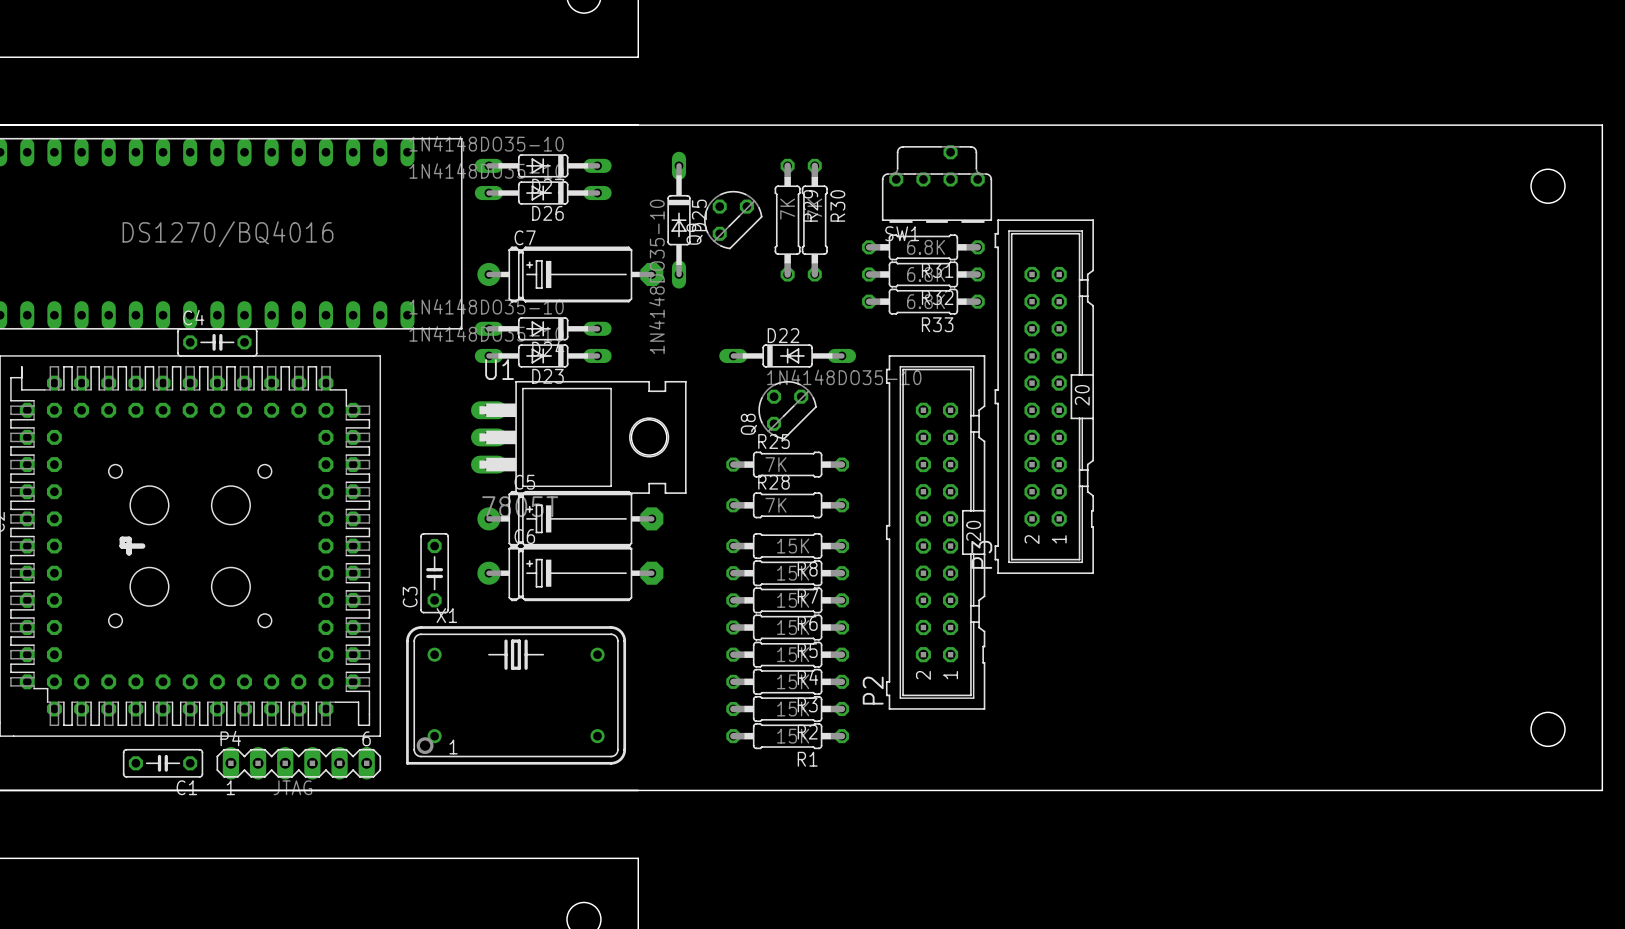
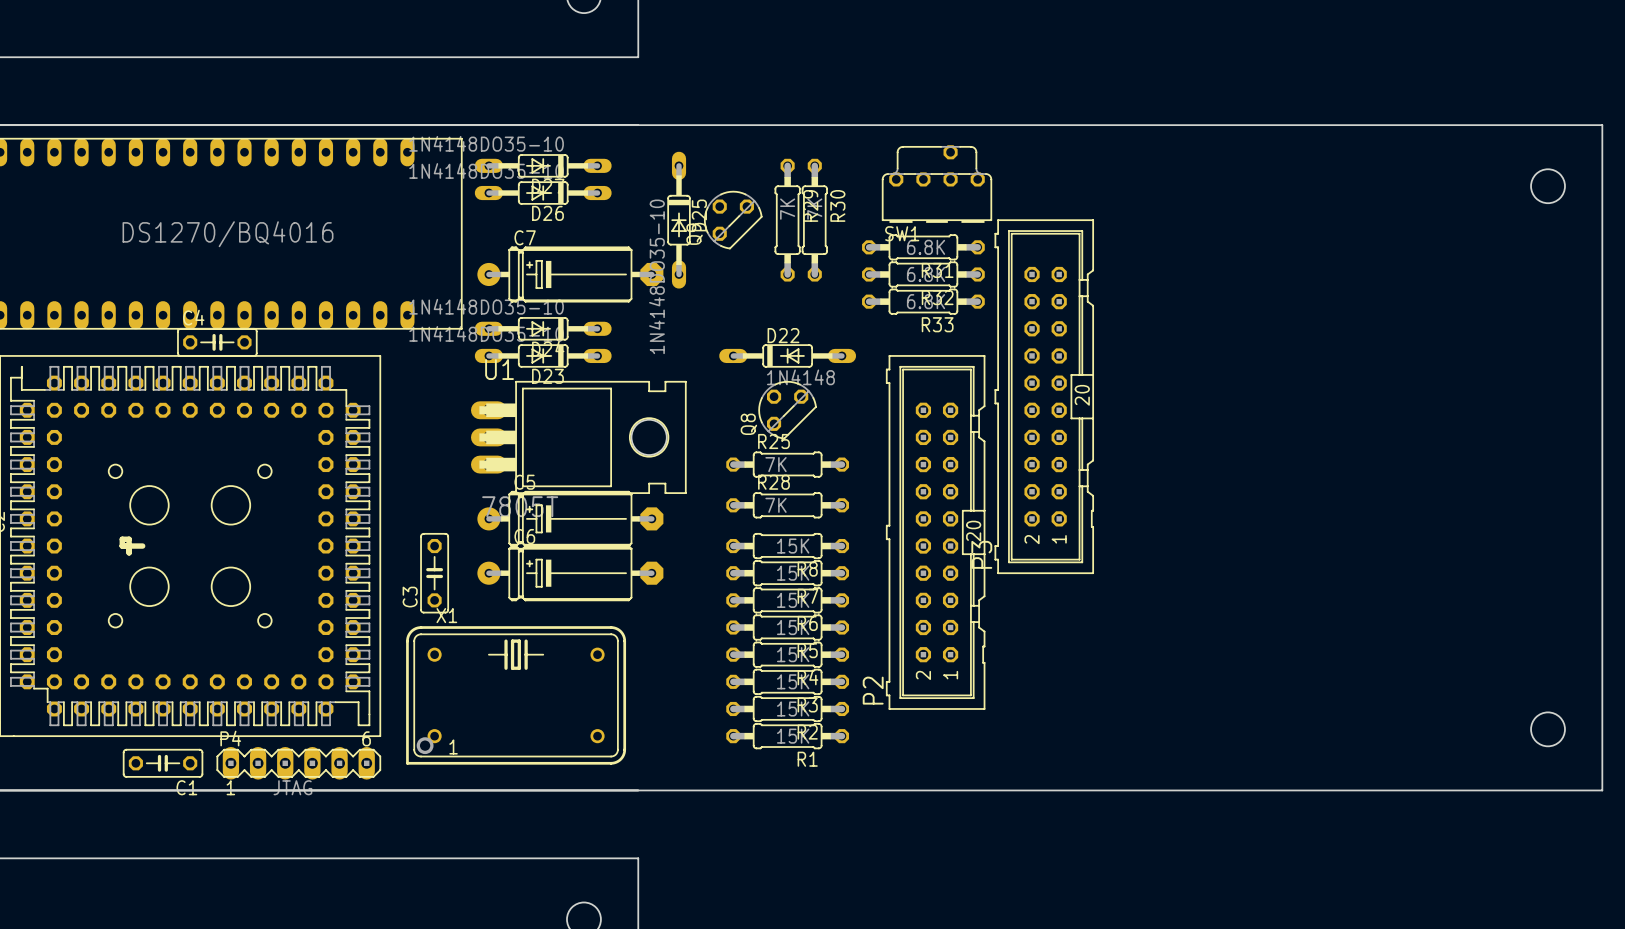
D22 value: 1N4148DO35-10 (844, 377) -> 1N4148 (800, 377)

